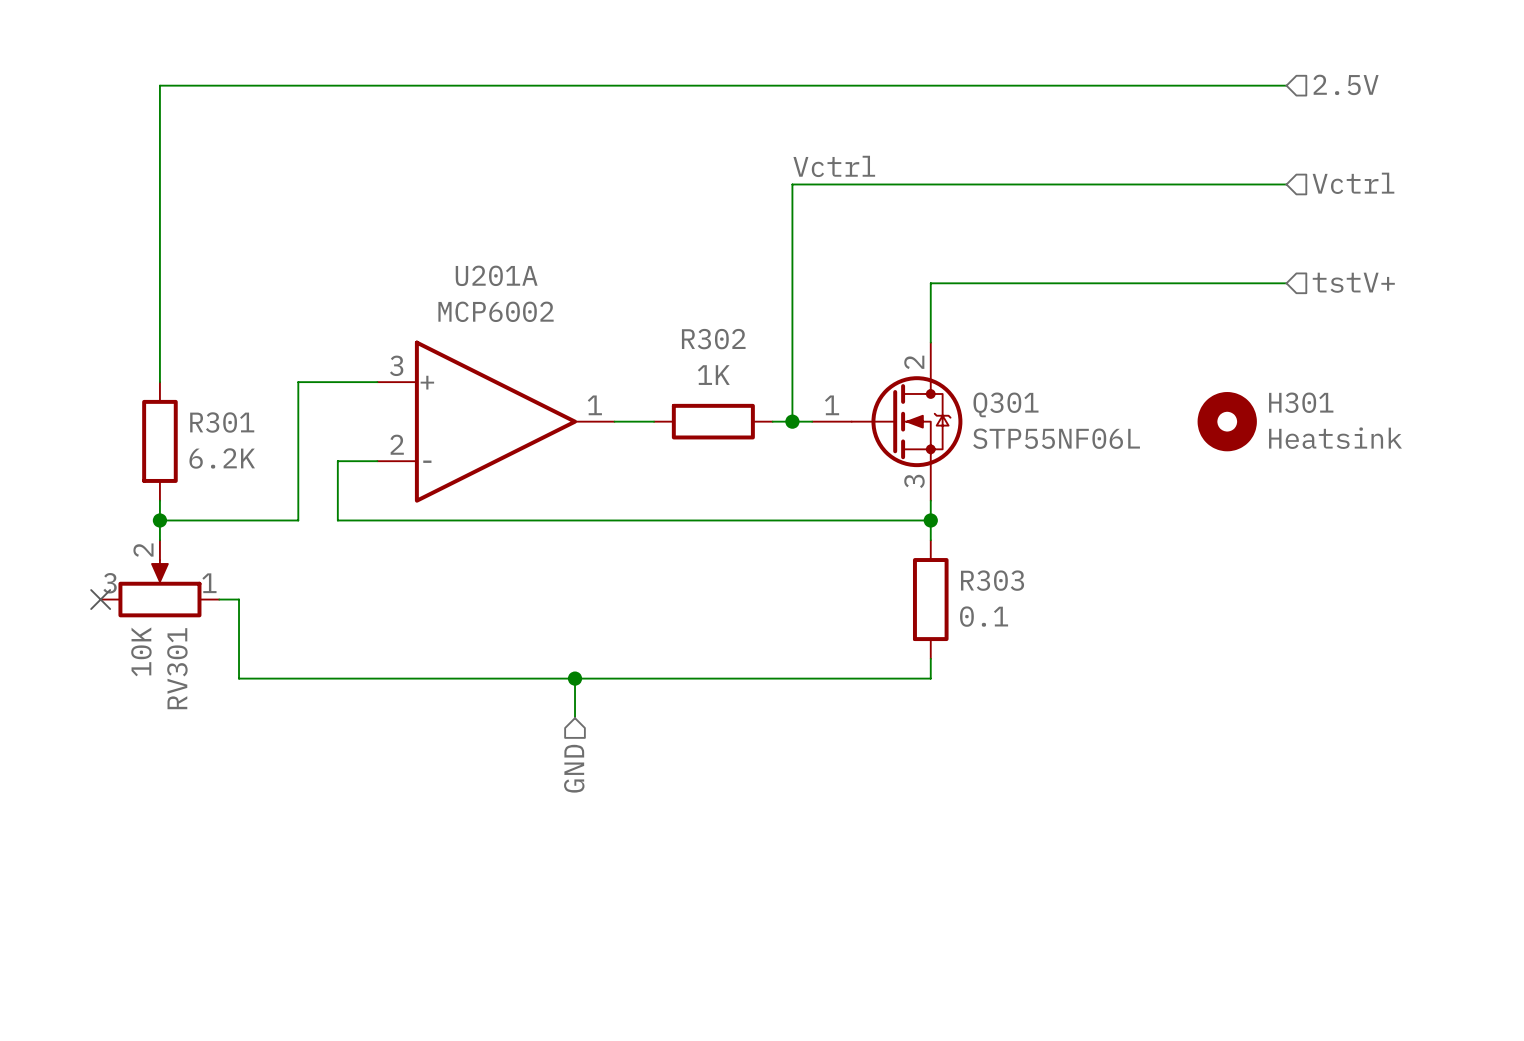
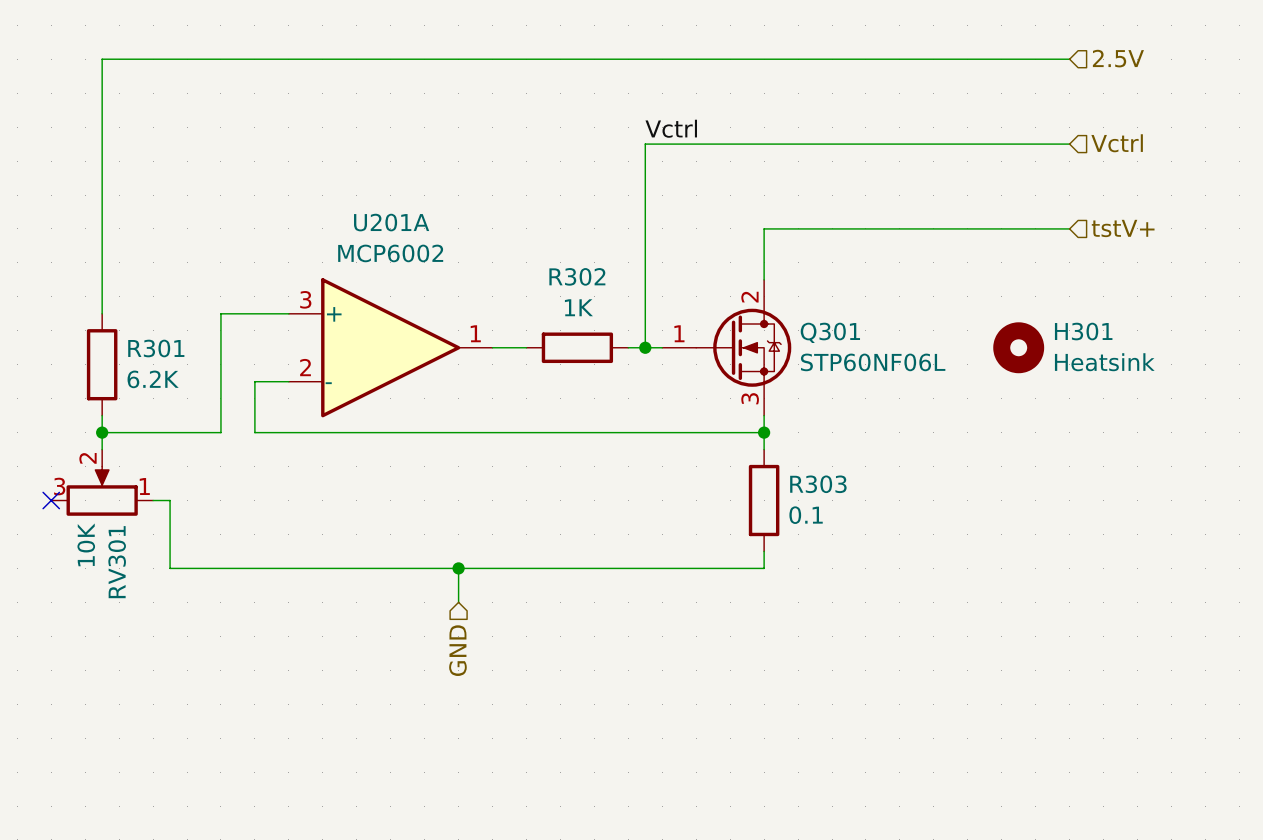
Q301 value: STP55NF06L (1056, 438) -> STP60NF06L (873, 362)

